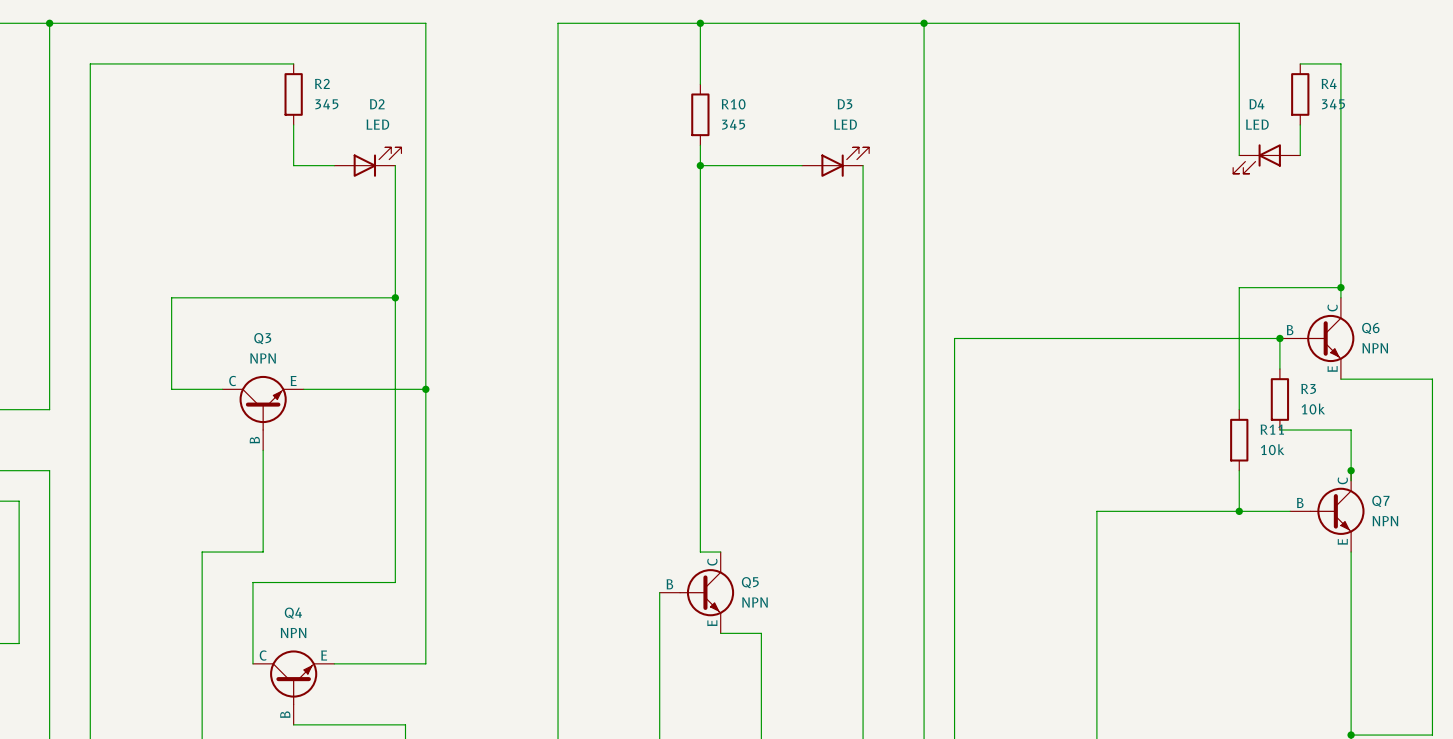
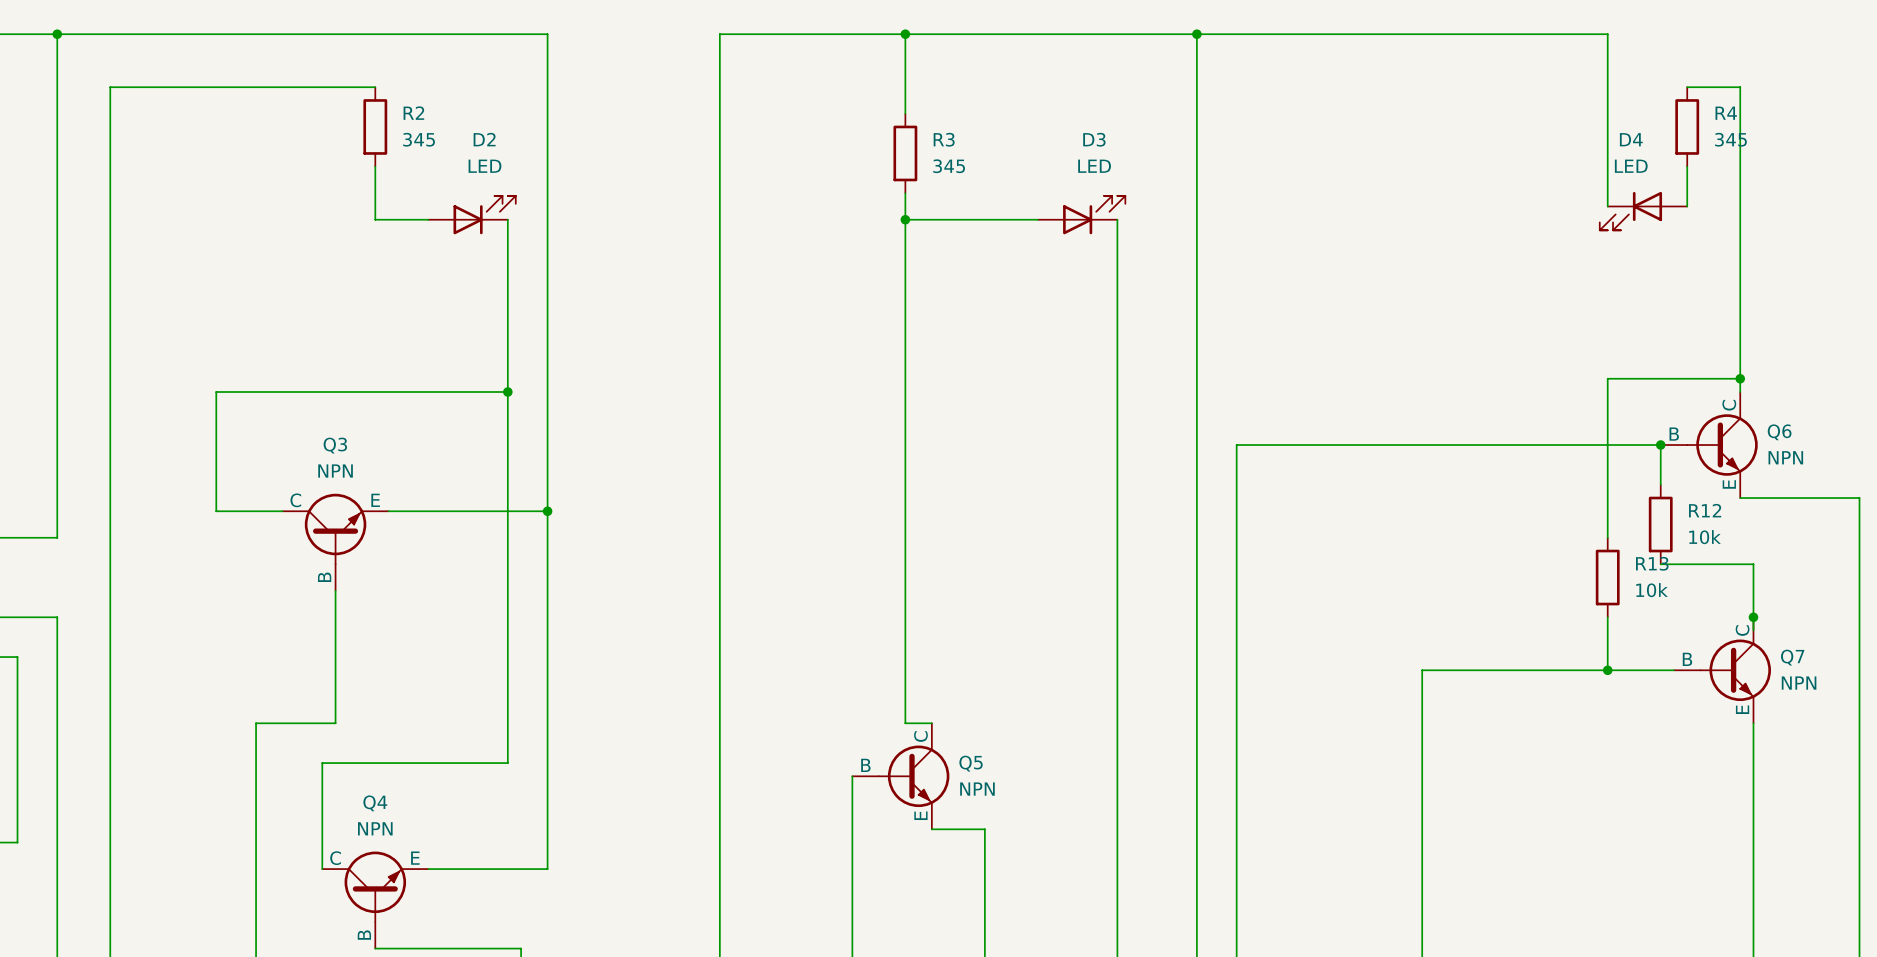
R10 name: R10 (733, 104) -> R3 (944, 139)
R3 name: R3 (1308, 388) -> R12 (1705, 510)
R11 name: R11 (1272, 429) -> R13 (1652, 563)

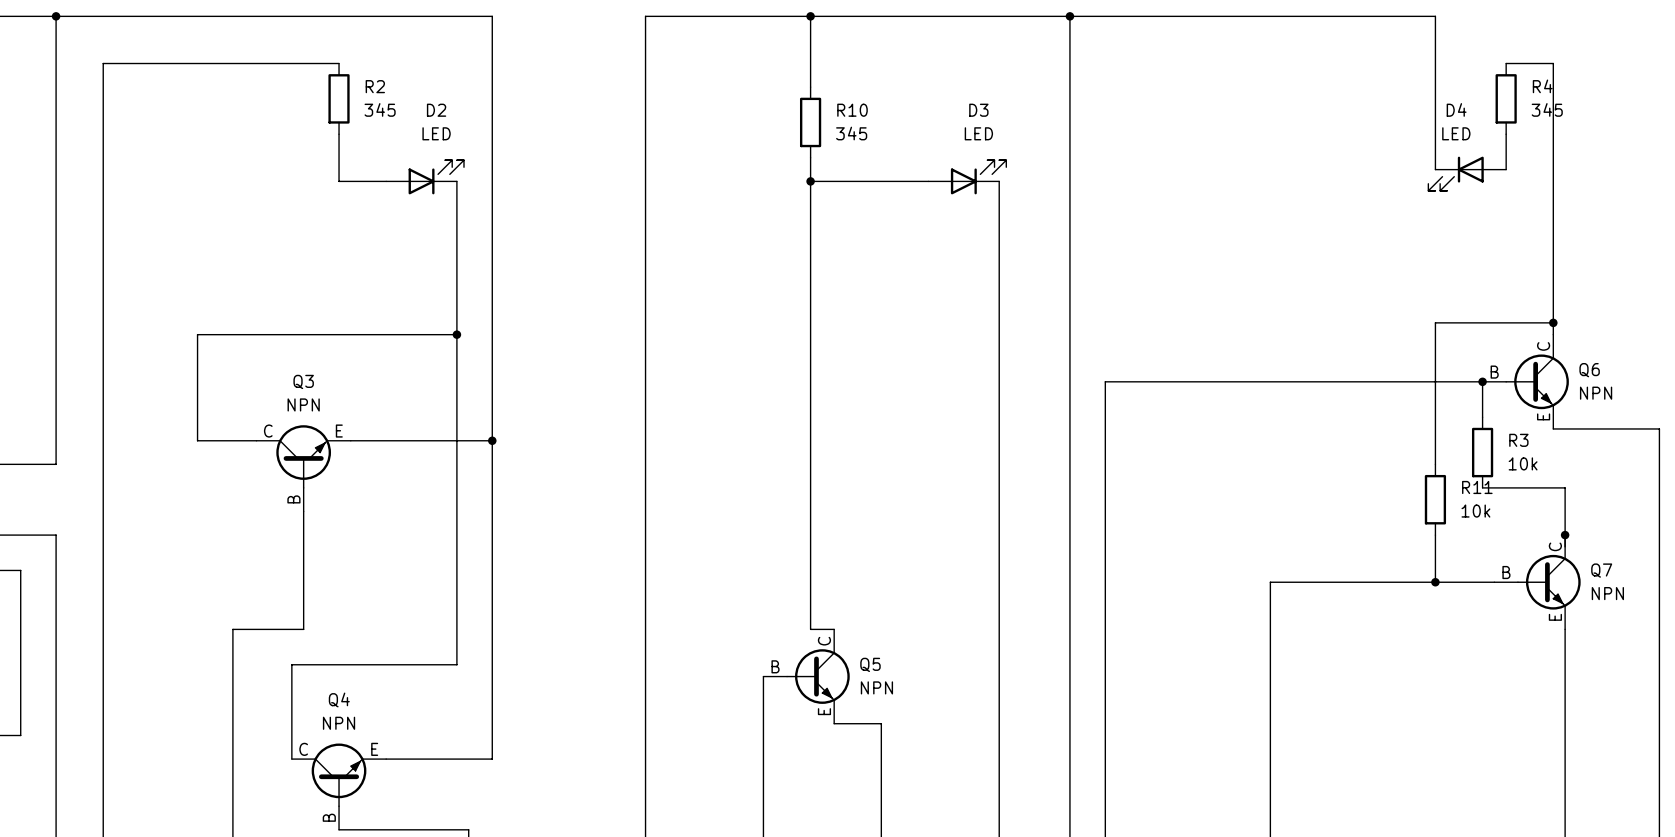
R3 name: R3 (944, 139) -> R10 (852, 110)
R12 name: R12 (1705, 510) -> R3 (1518, 440)
R13 name: R13 (1652, 563) -> R11 (1477, 487)

